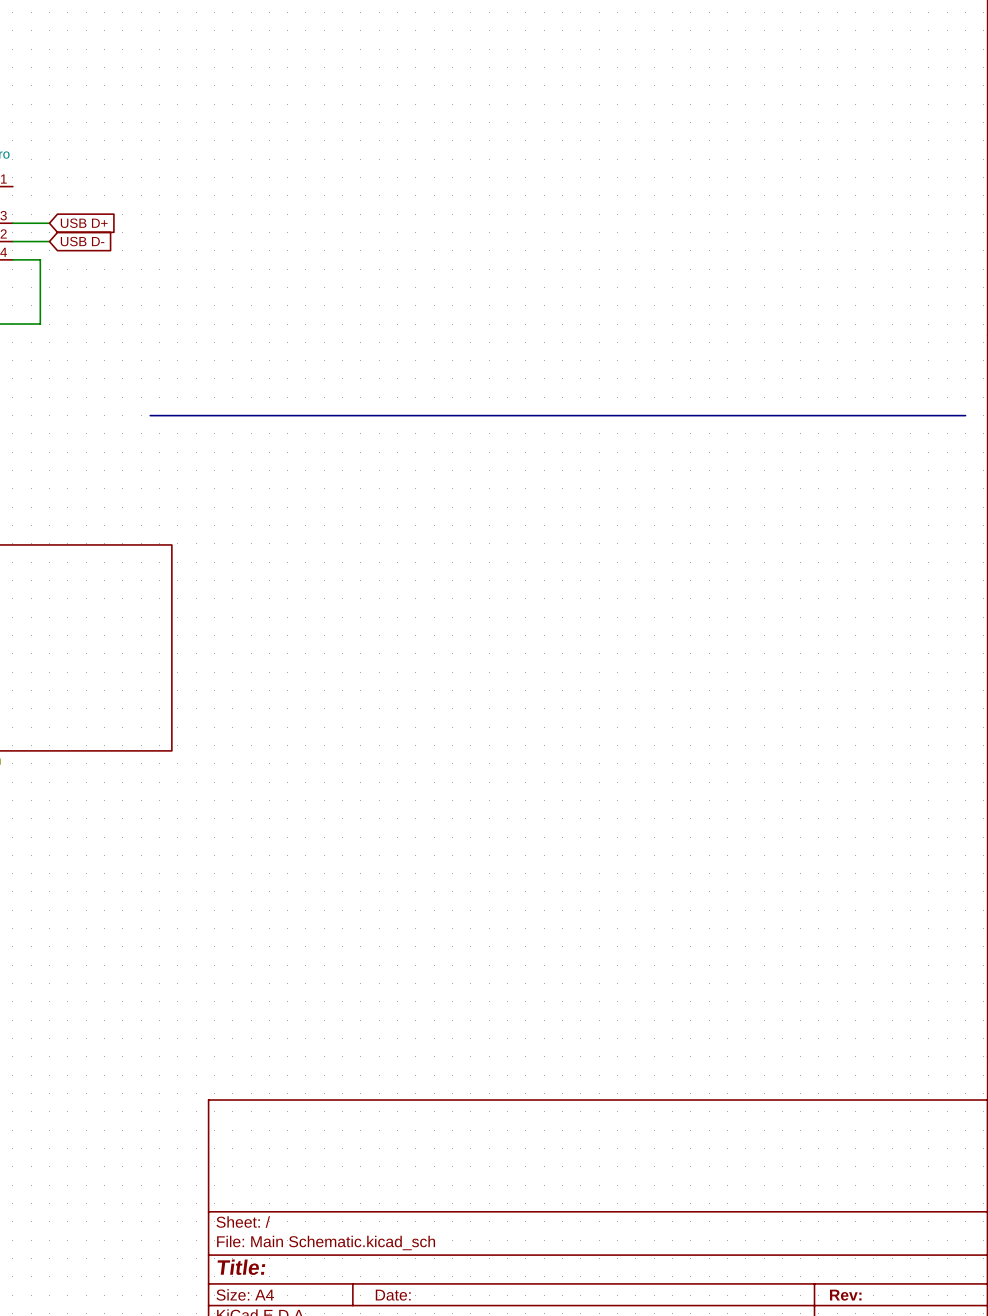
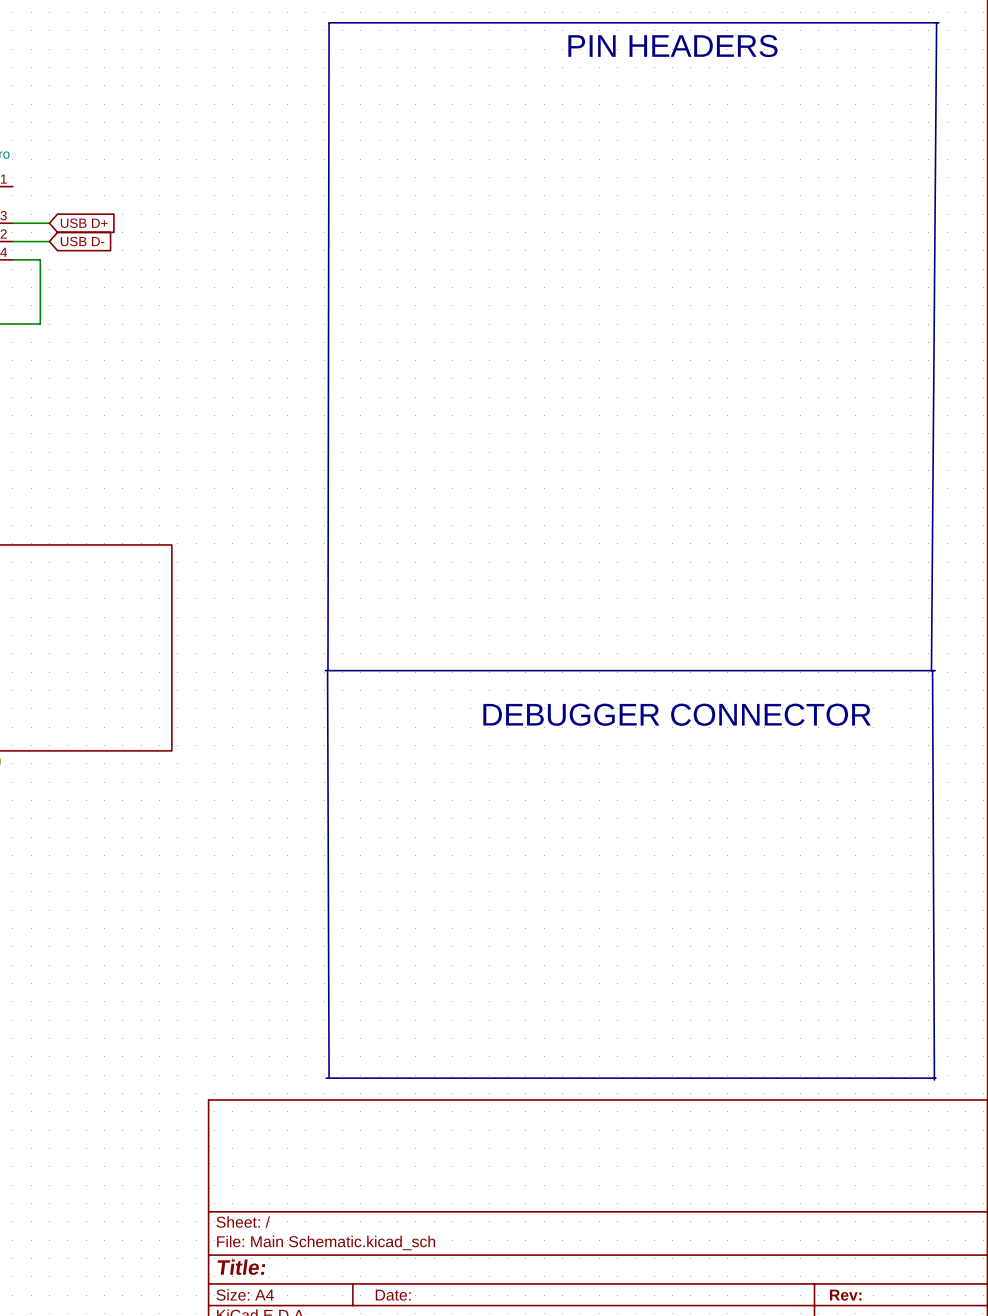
line: none -> (329, 22) (938, 22)
line: none -> (936, 22) (931, 670)
line: none -> (329, 23) (327, 670)
text: none -> PIN HEADERS (672, 46)
line: (150, 415) (965, 415) -> none
line: none -> (325, 670) (935, 670)
line: none -> (932, 671) (934, 1079)
line: none -> (327, 672) (329, 1076)
text: none -> DEBUGGER CONNECTOR (677, 714)
line: none -> (326, 1078) (935, 1078)

